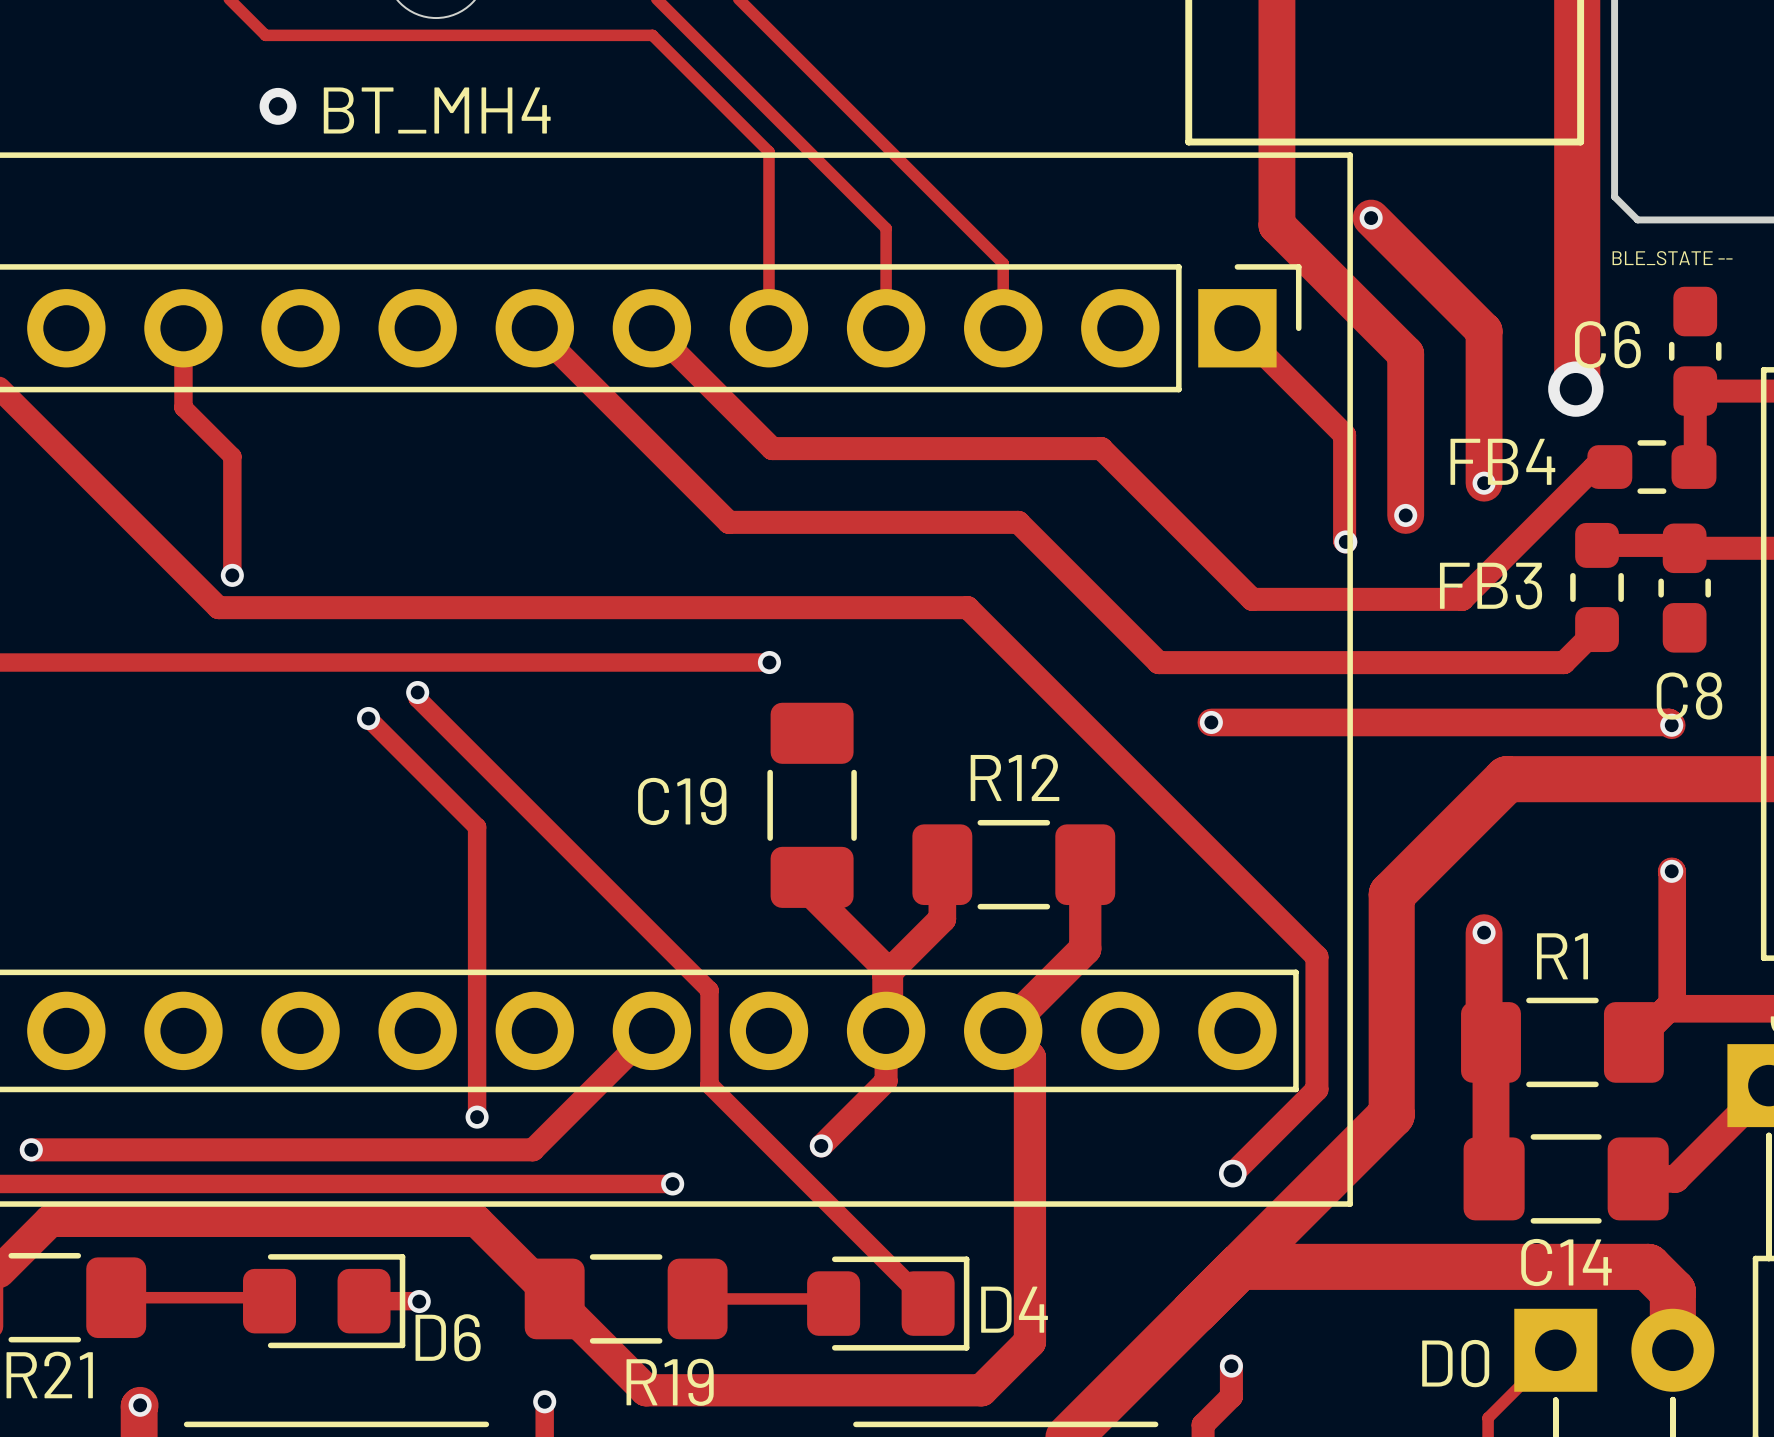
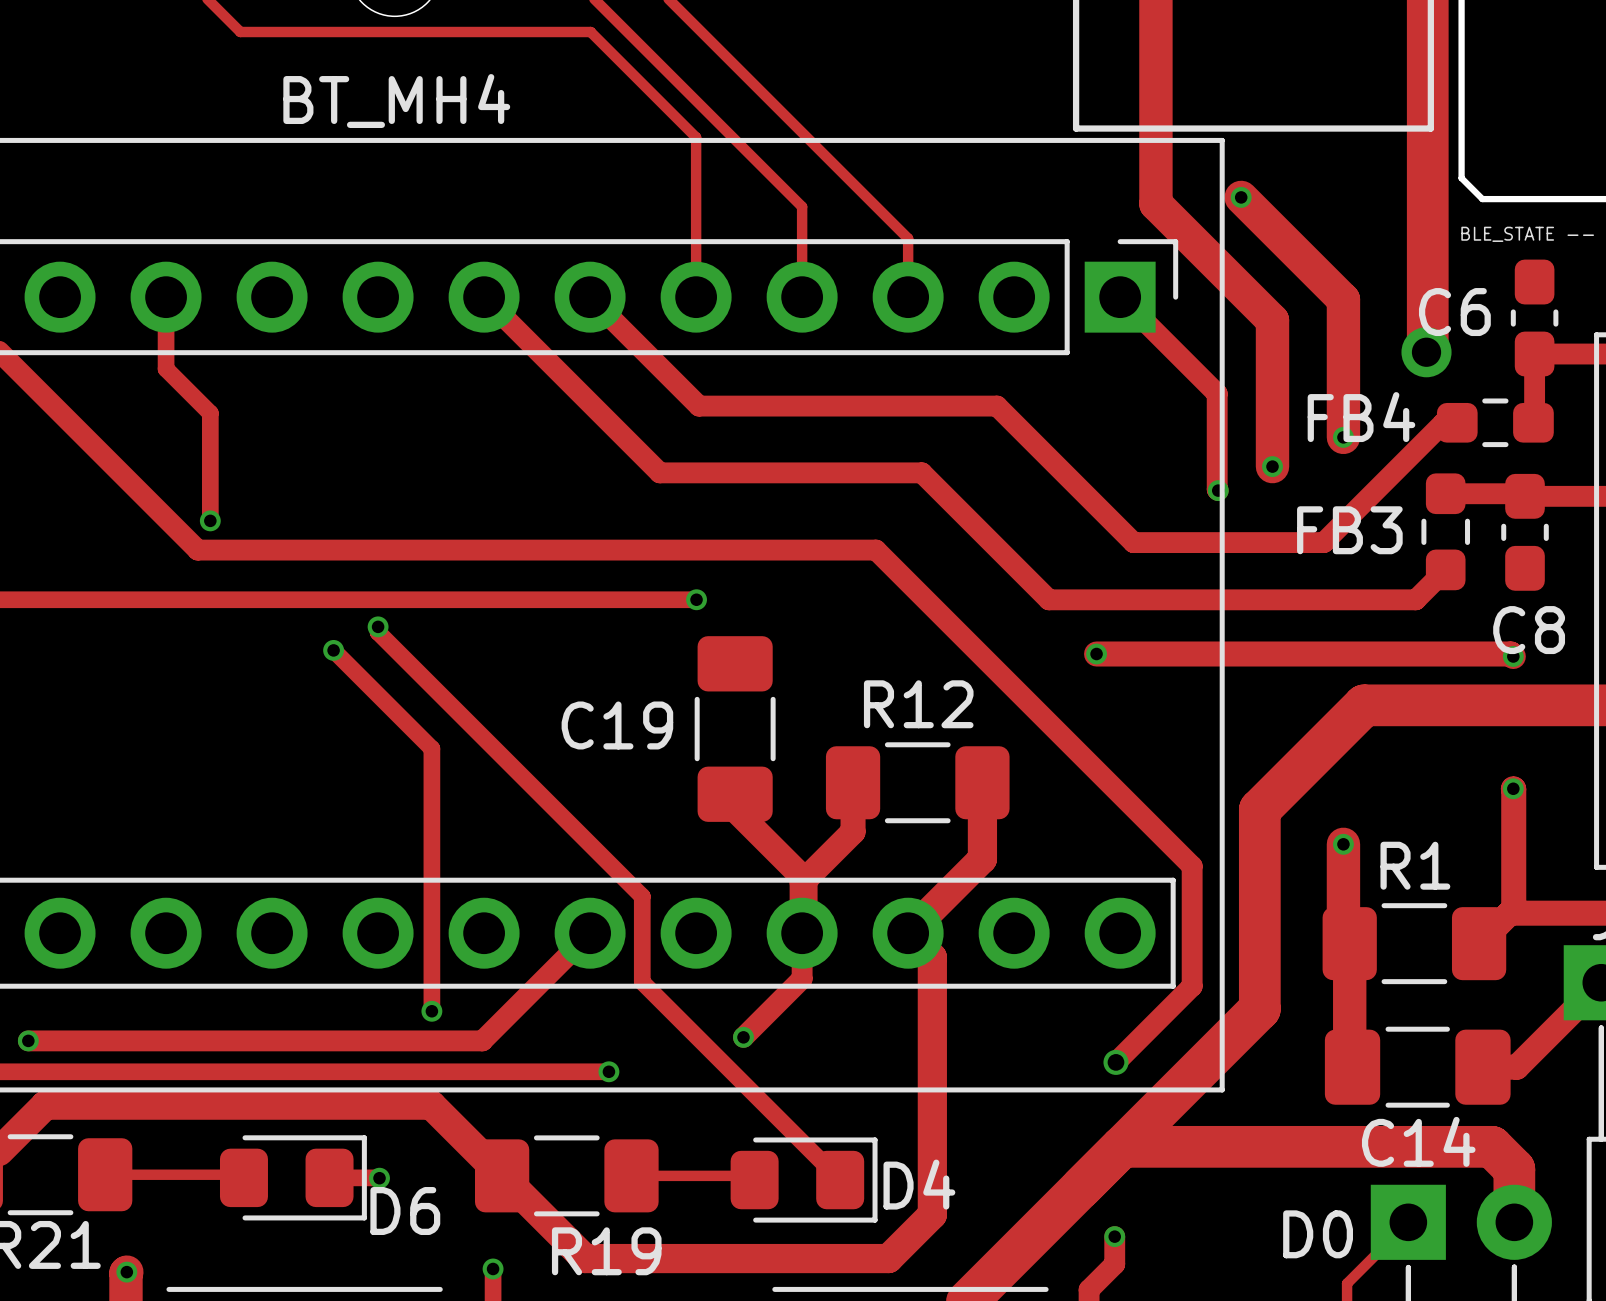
via: (278, 106) -> none

